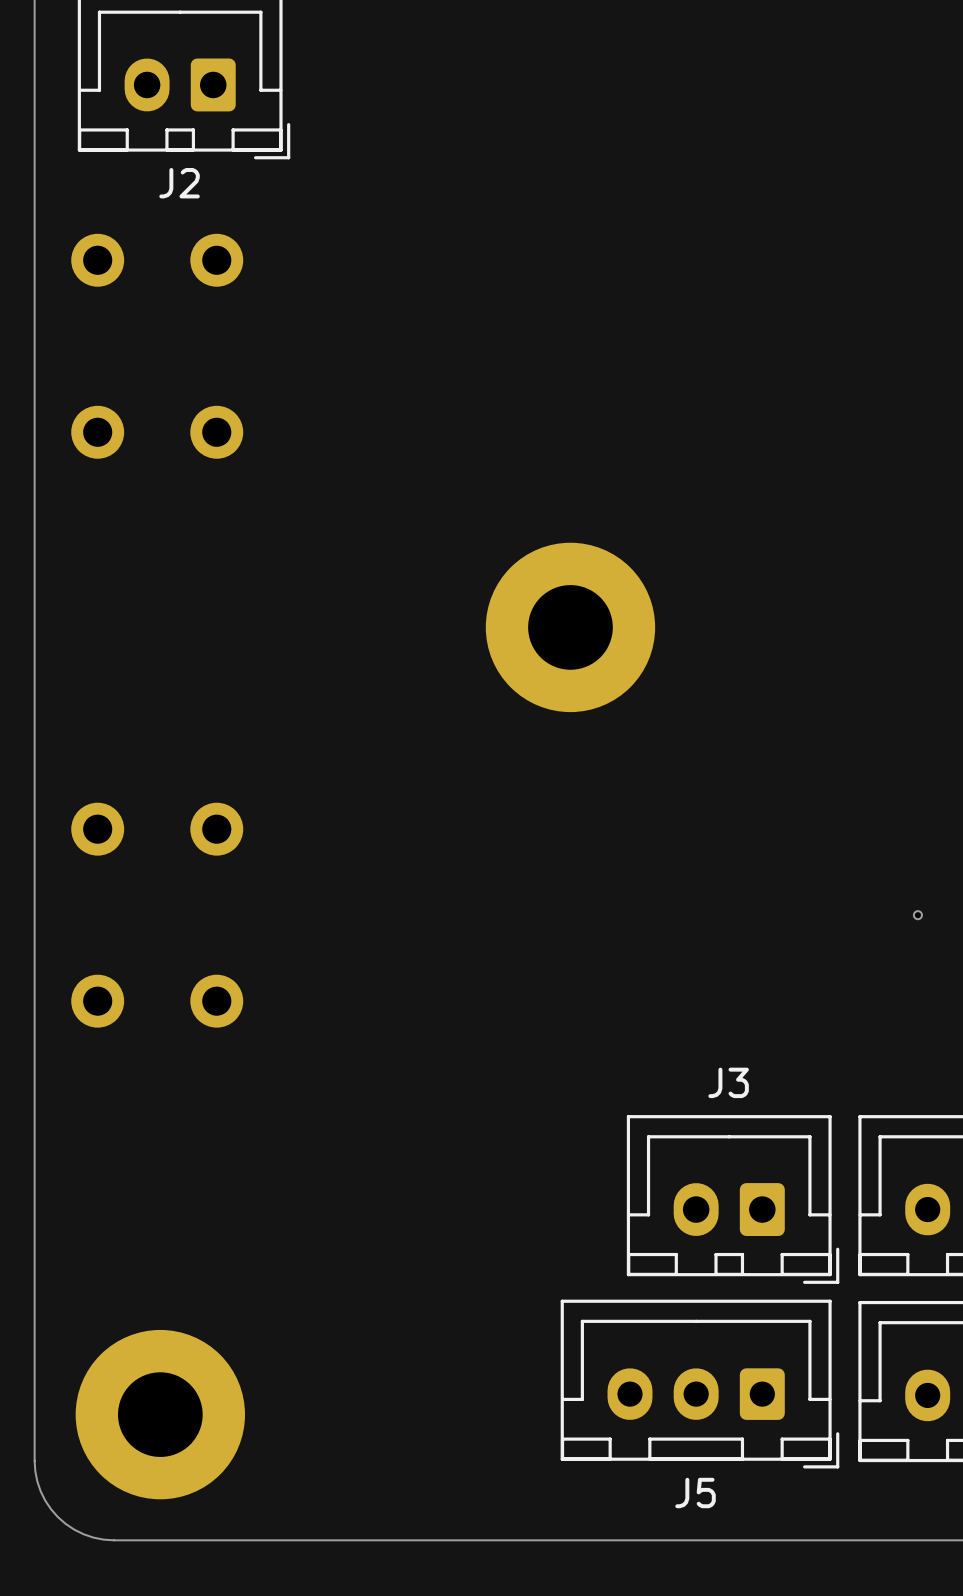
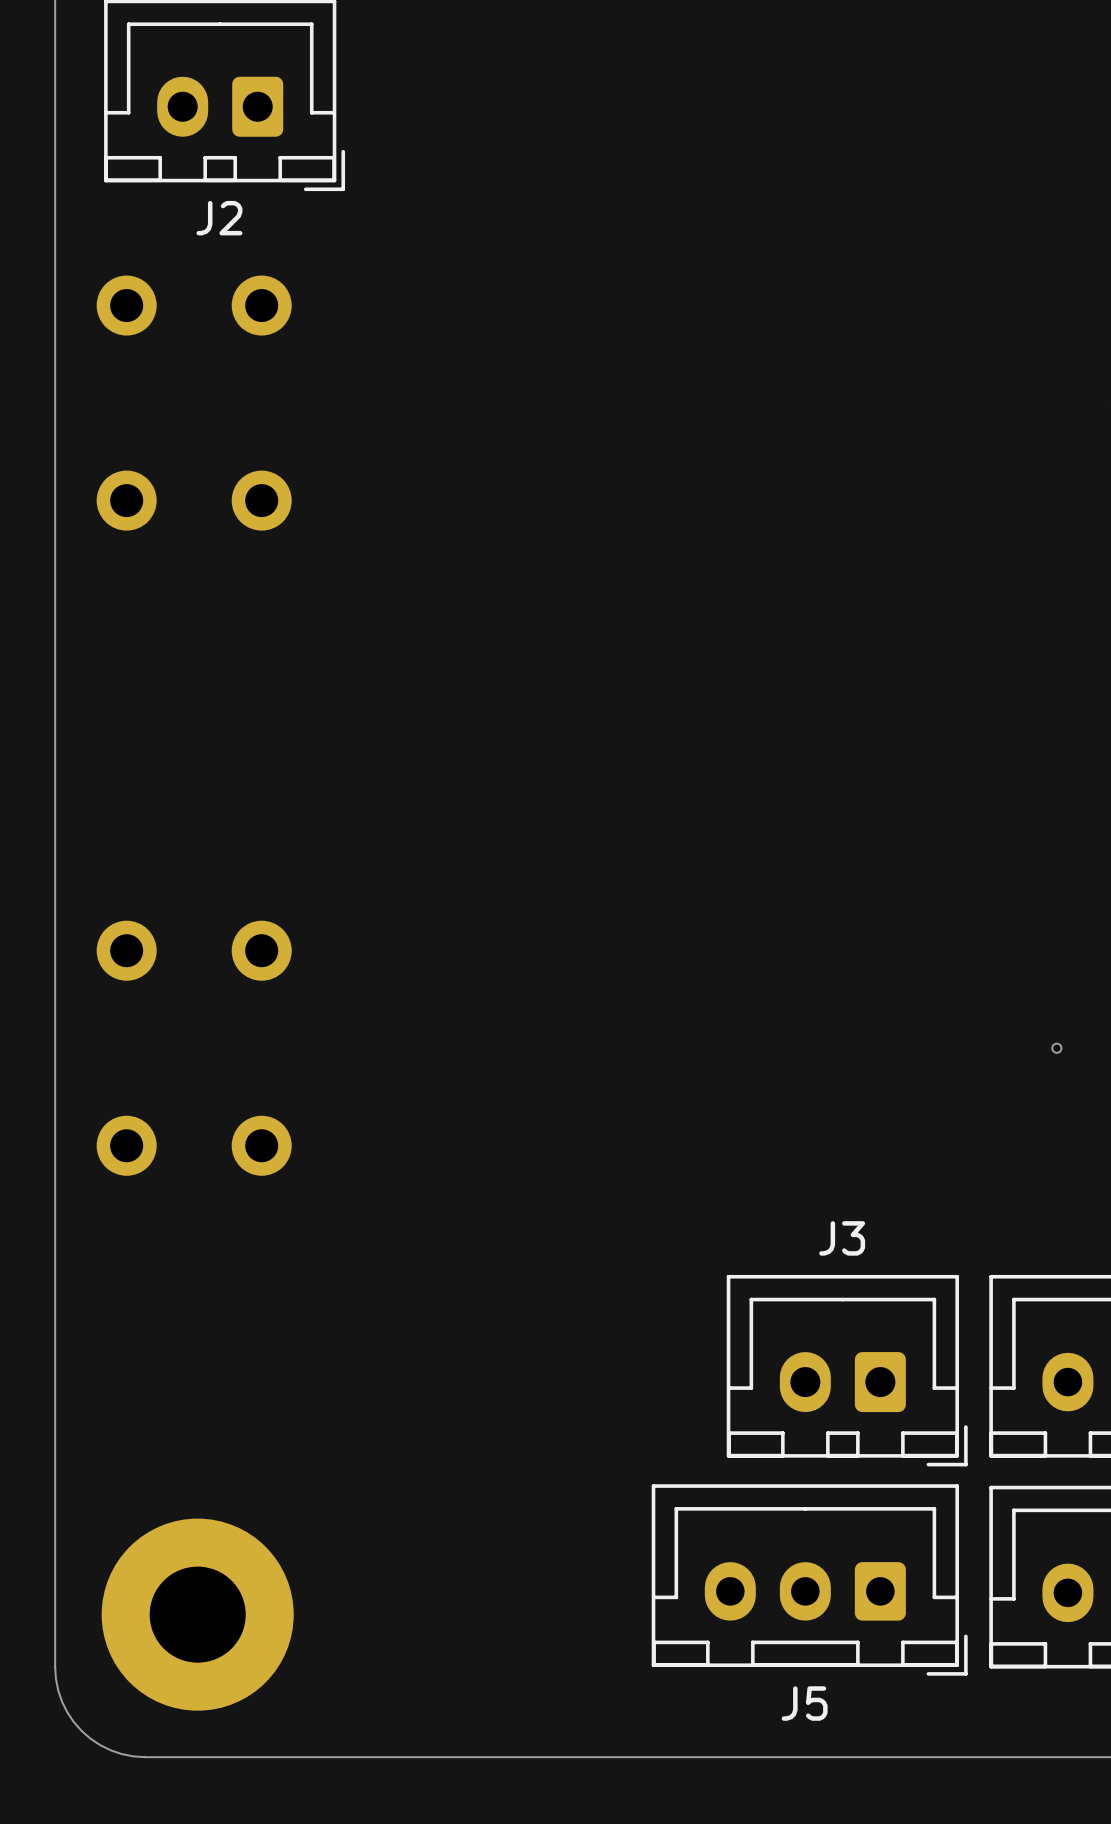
part: (570, 627) -> none

